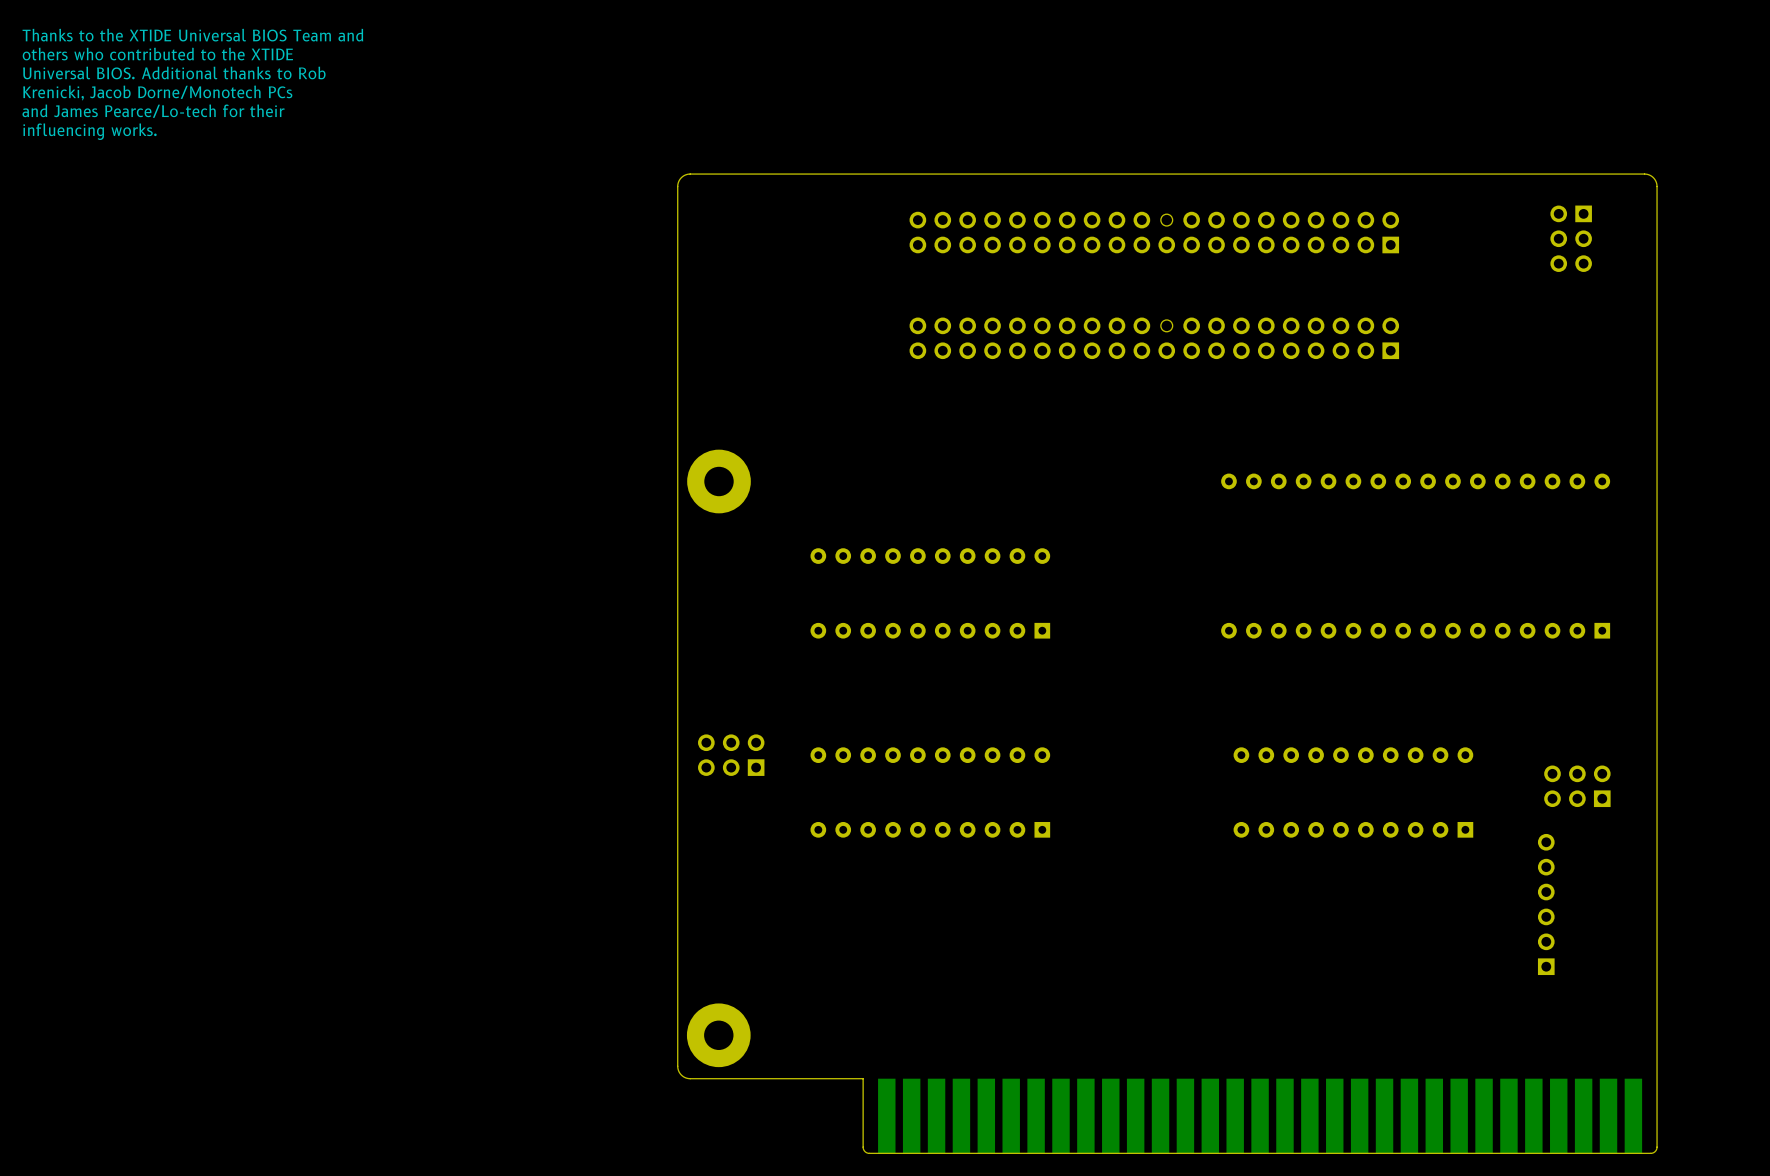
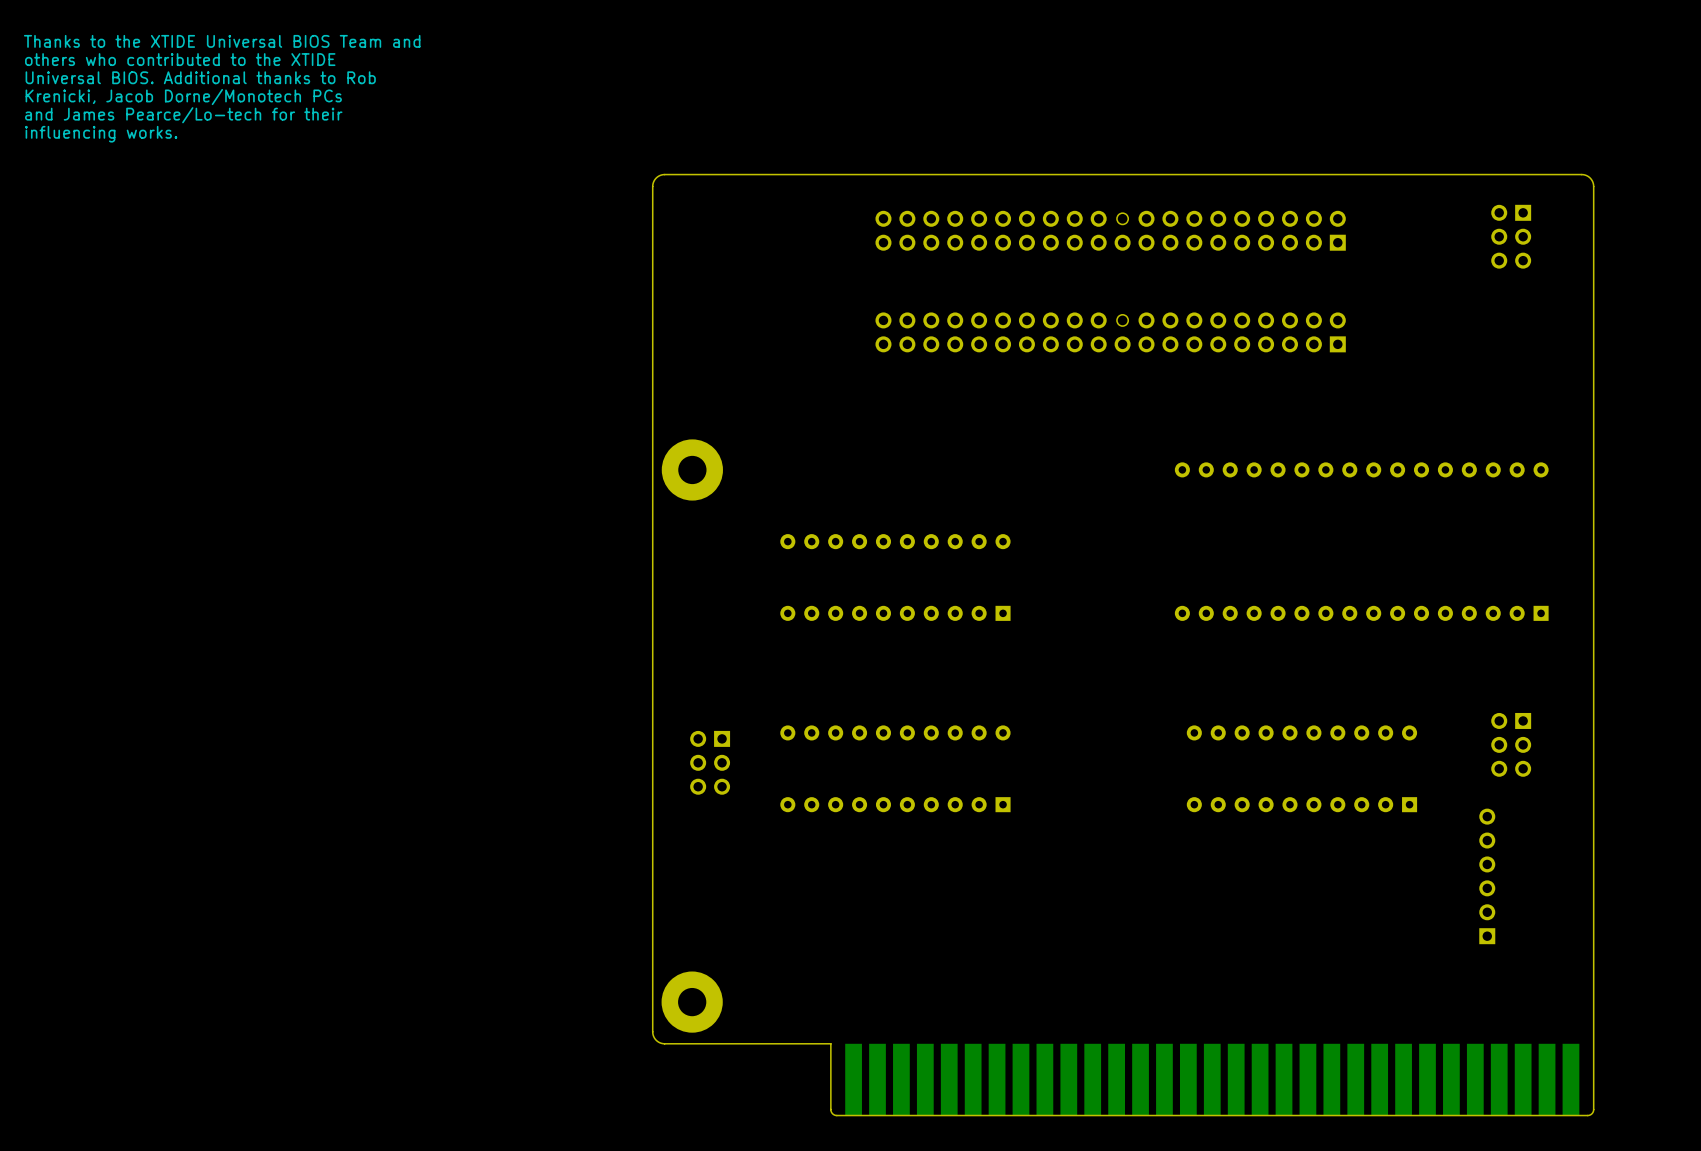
part rotation: 0° (731, 755) -> 90° counterclockwise (710, 762)
part rotation: 0° (1577, 786) -> 90° counterclockwise (1511, 744)

